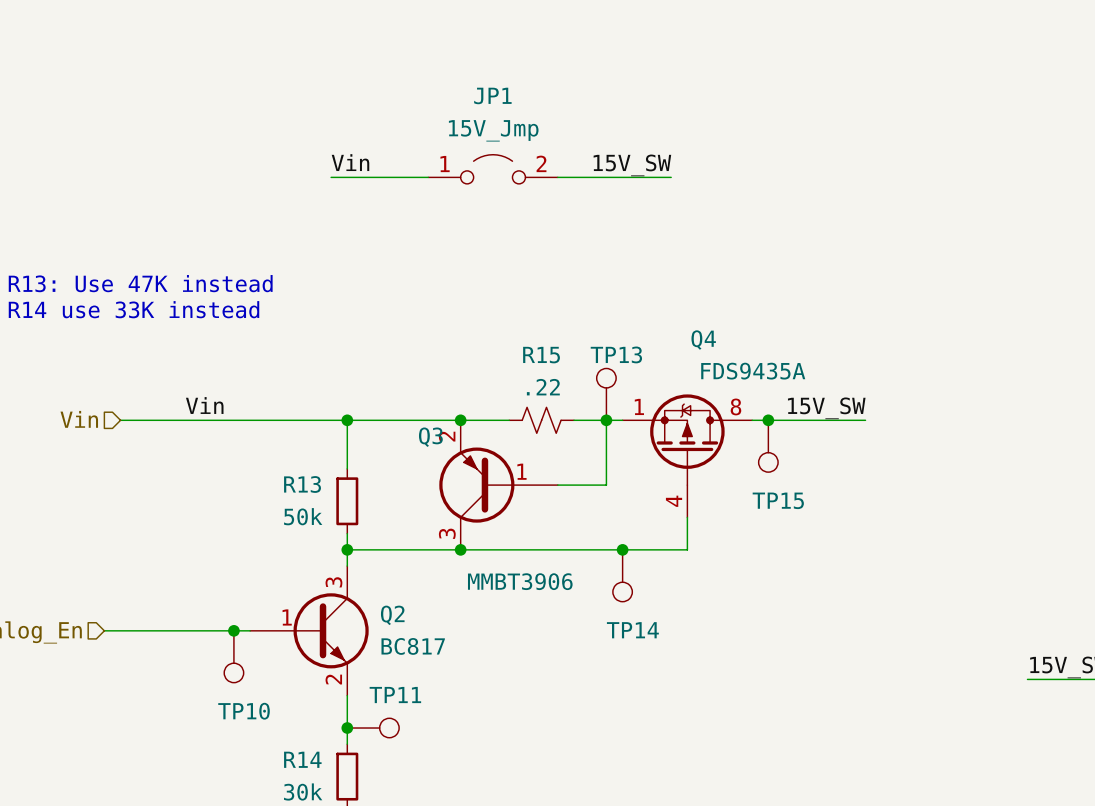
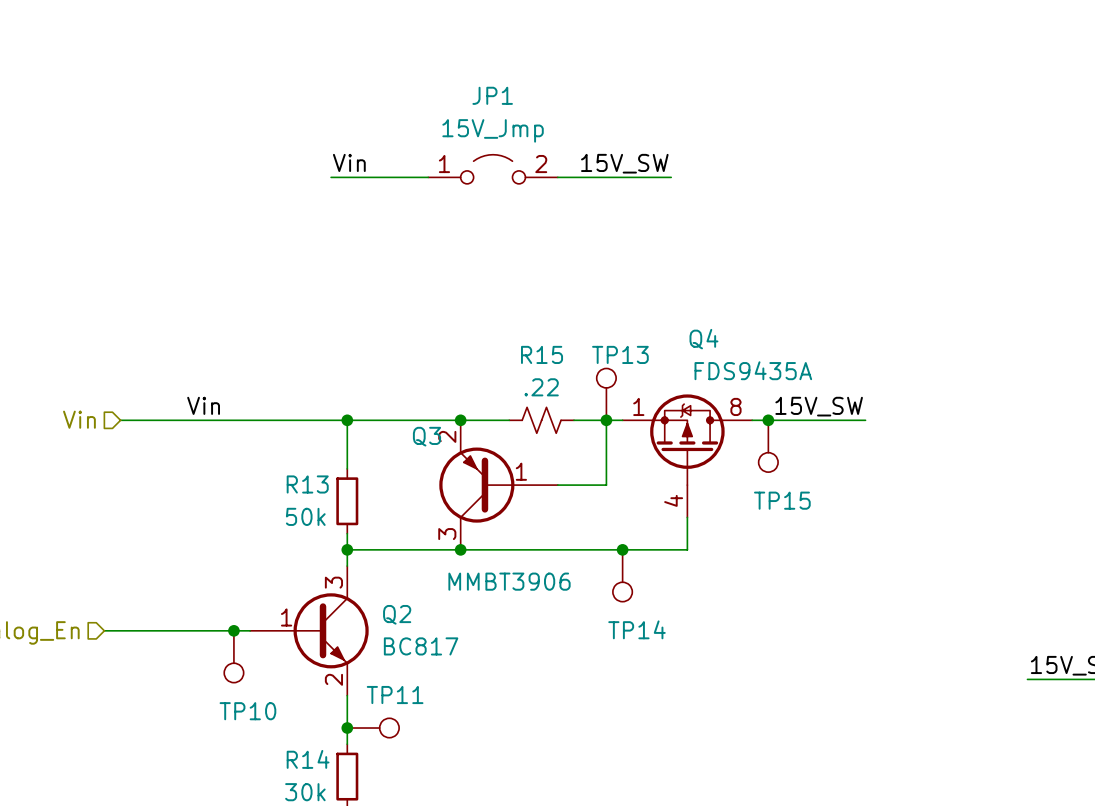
text: R13: Use 47K instead (140, 283) -> none
text: R14 use 33K instead (134, 309) -> none

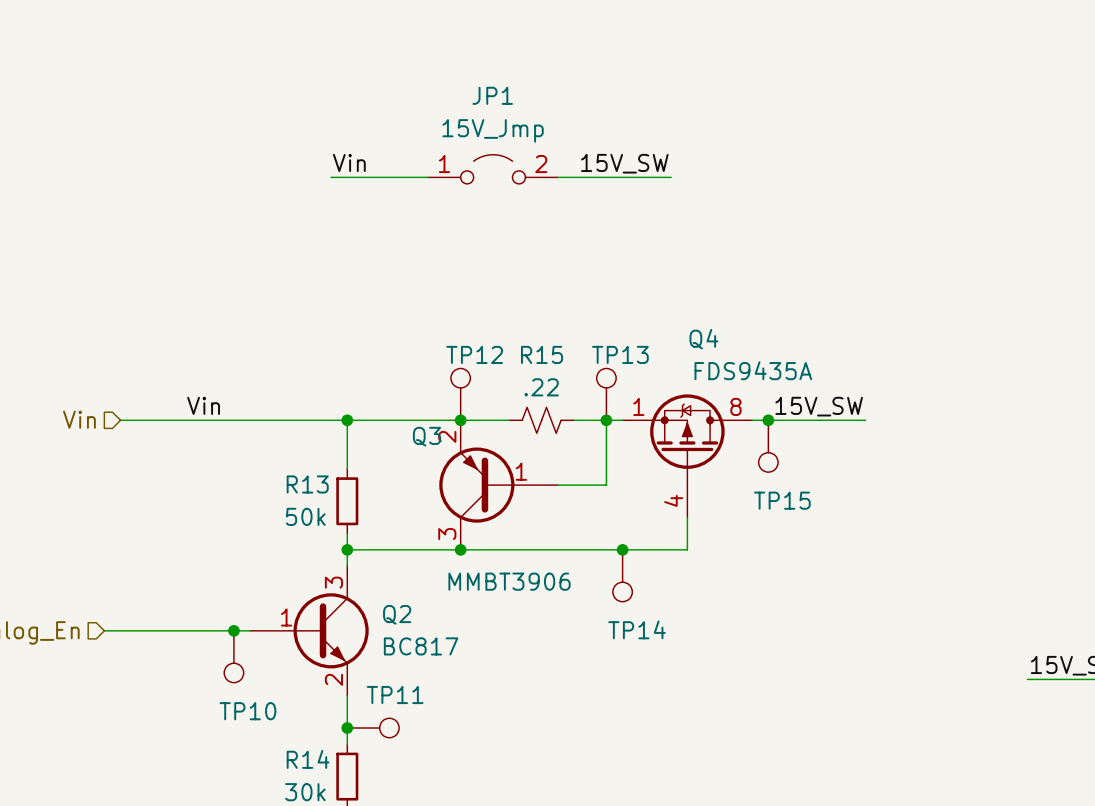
TP12: none -> (460, 394)

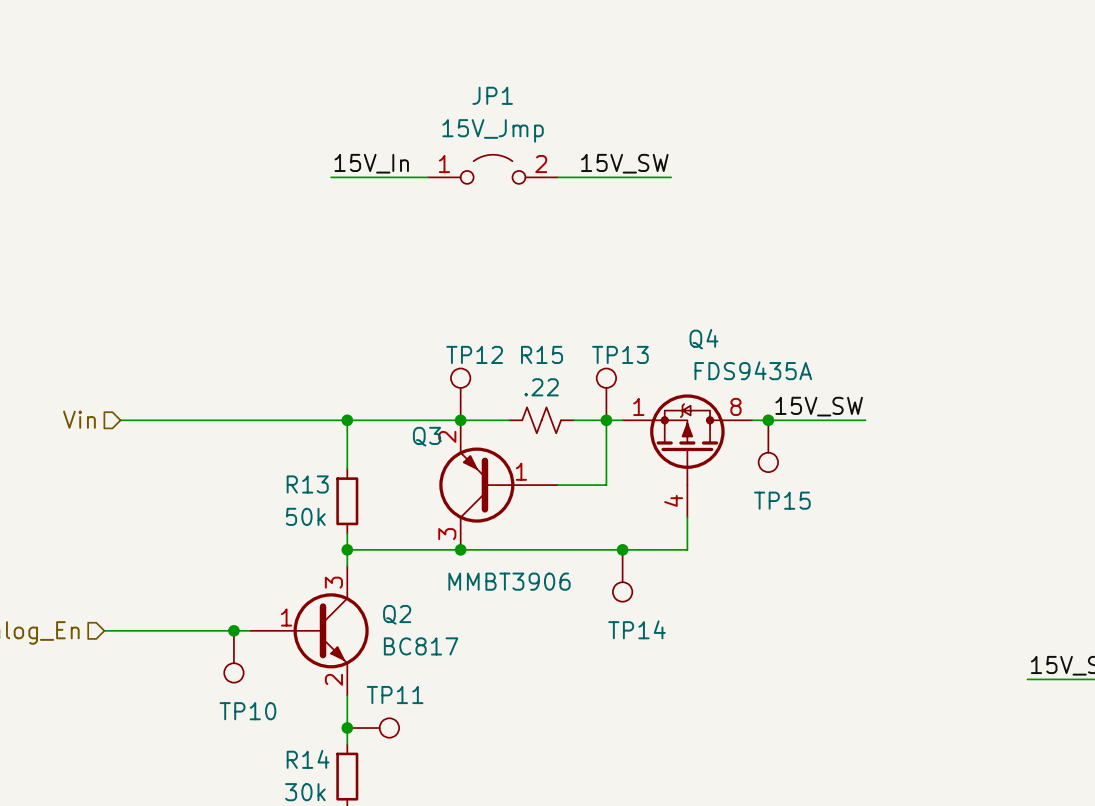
label: Vin (349, 162) -> 15V_In (371, 163)
label: Vin (203, 405) -> none

